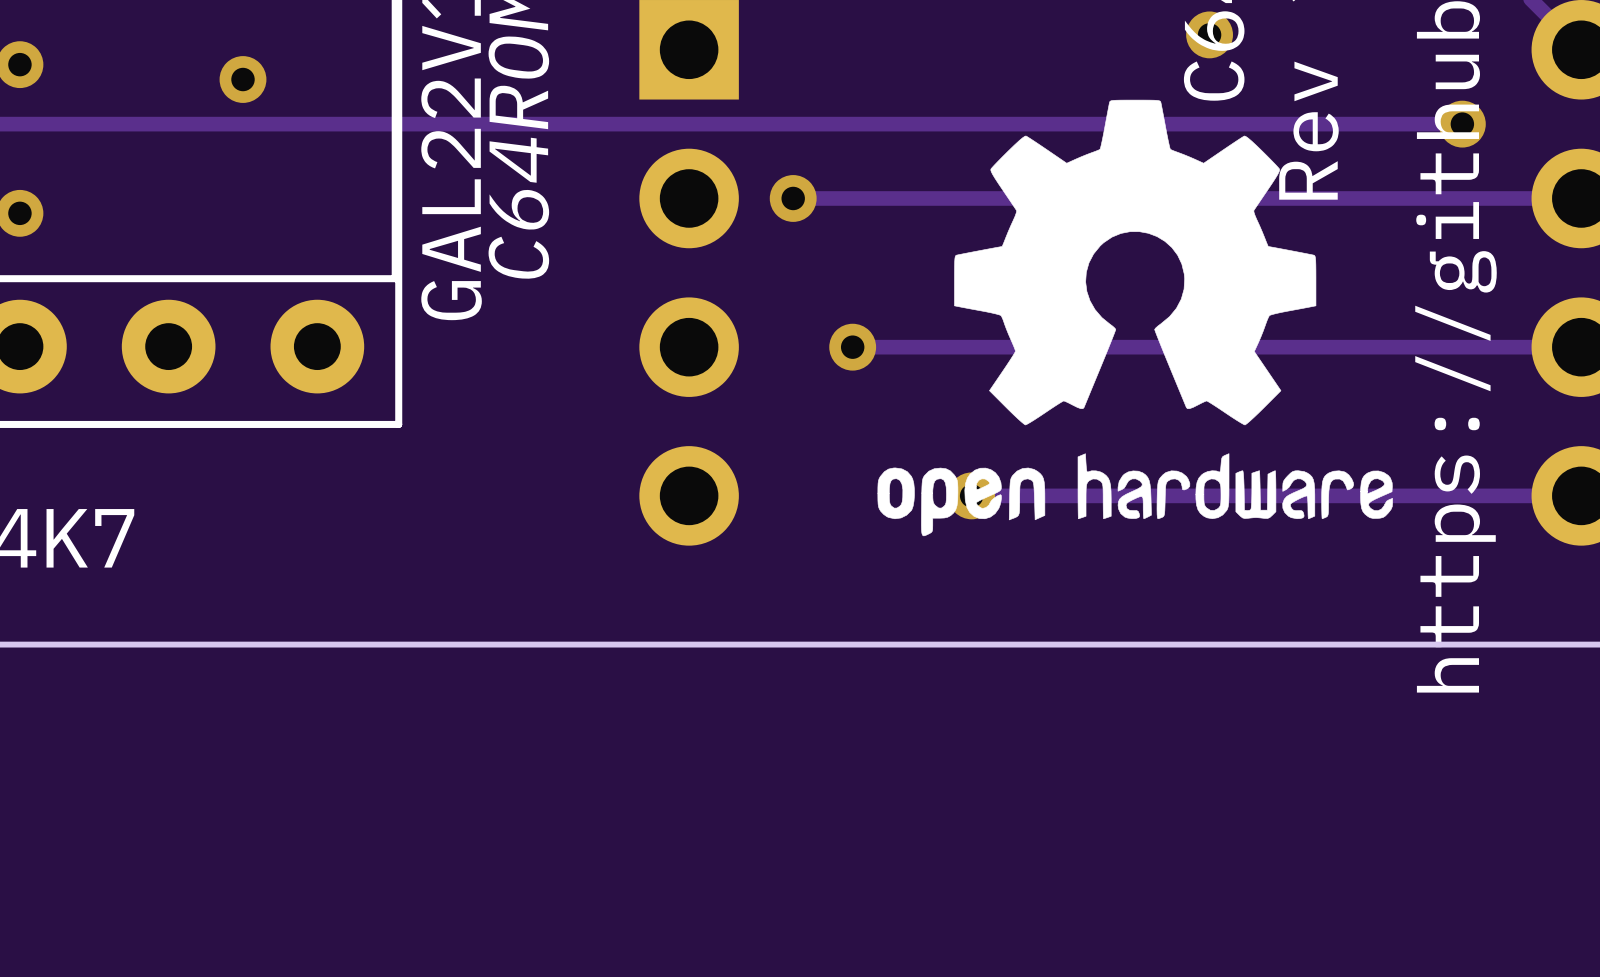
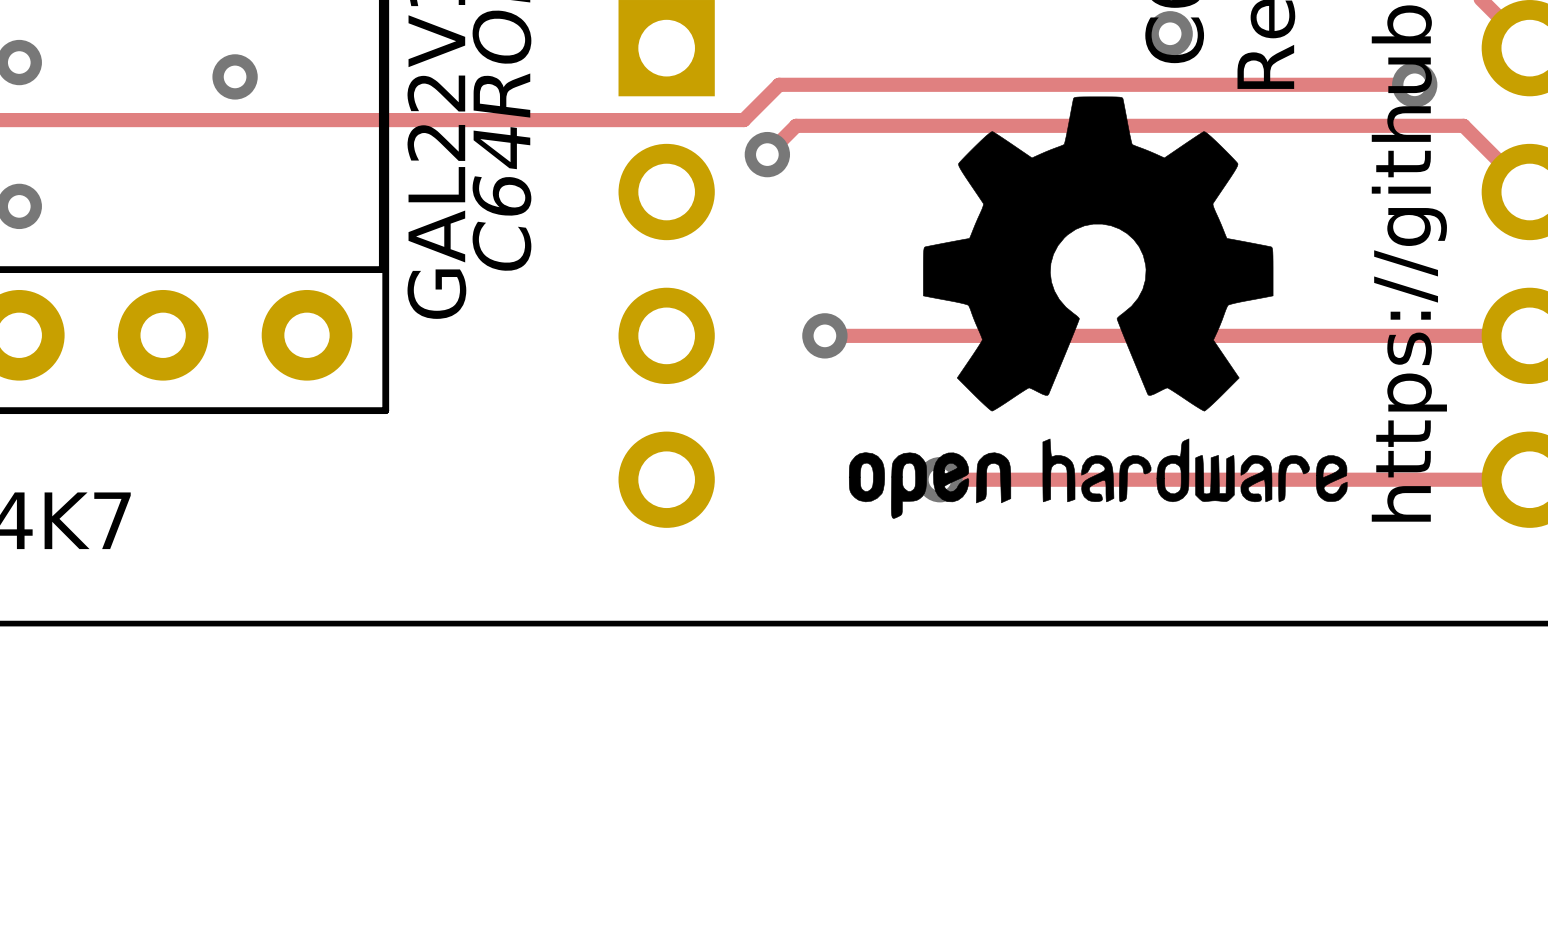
track: (768, 124) (1462, 124) -> (743, 120) (779, 84) (1414, 84)
via position: (1462, 124) -> (1414, 84)
track: (793, 198) (1581, 198) -> (767, 154) (796, 125) (1463, 125) (1529, 192)
via position: (793, 198) -> (767, 154)

